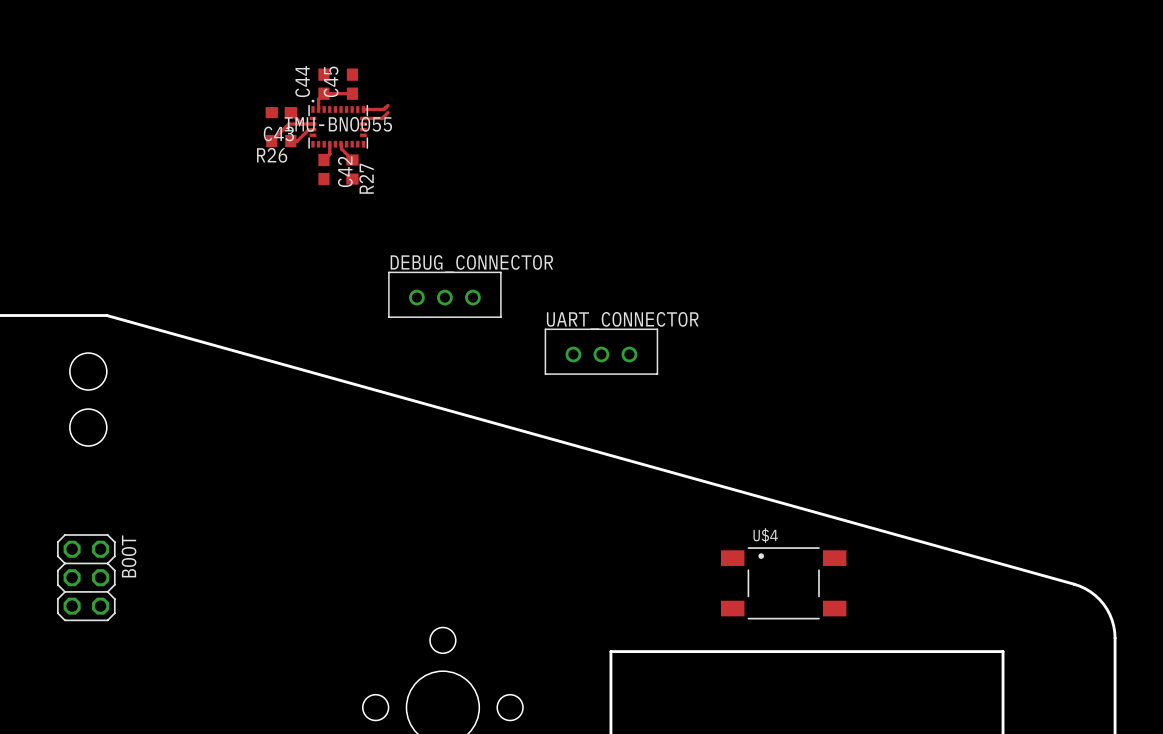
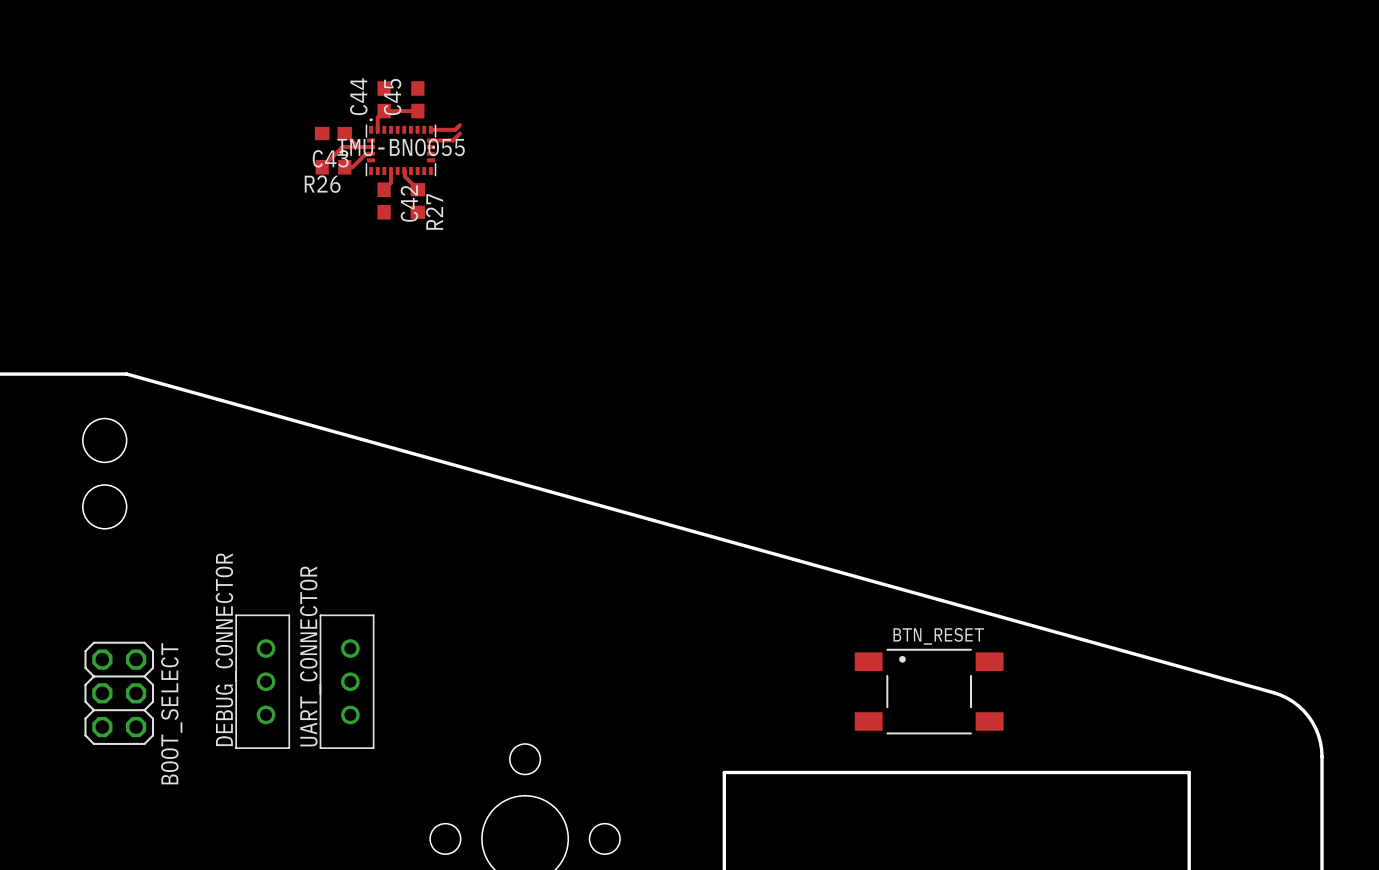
DEBUG_CONNECTOR: (444, 294) -> none
UART_CONNECTOR: (601, 351) -> none
U$4 name: U$4 (765, 535) -> BTN_RESET (938, 636)
DEBUG_CONNECTOR: none -> (262, 681)
UART_CONNECTOR: none -> (347, 681)
BOOT: (86, 577) -> none
BOOT_SELECT: none -> (119, 693)

